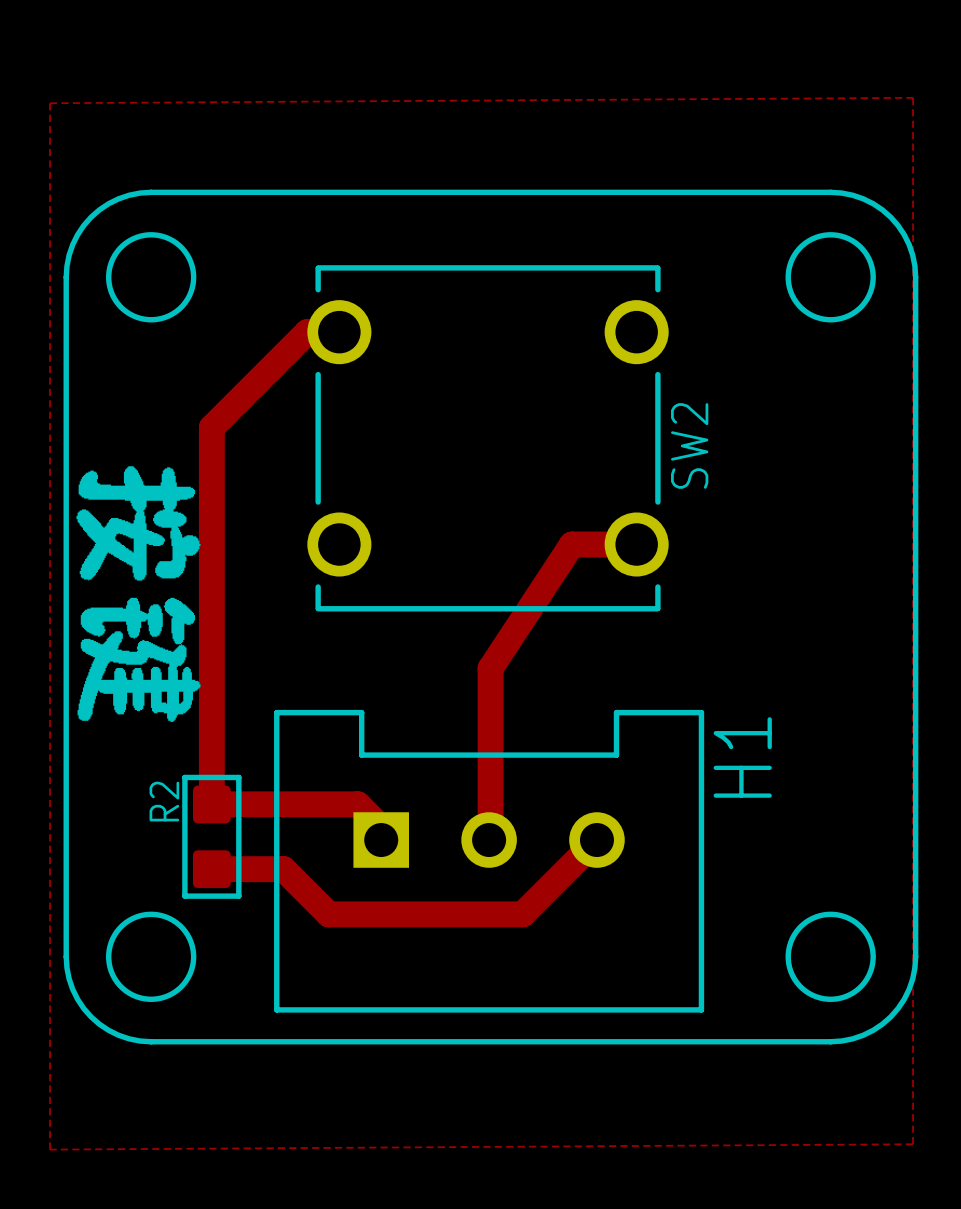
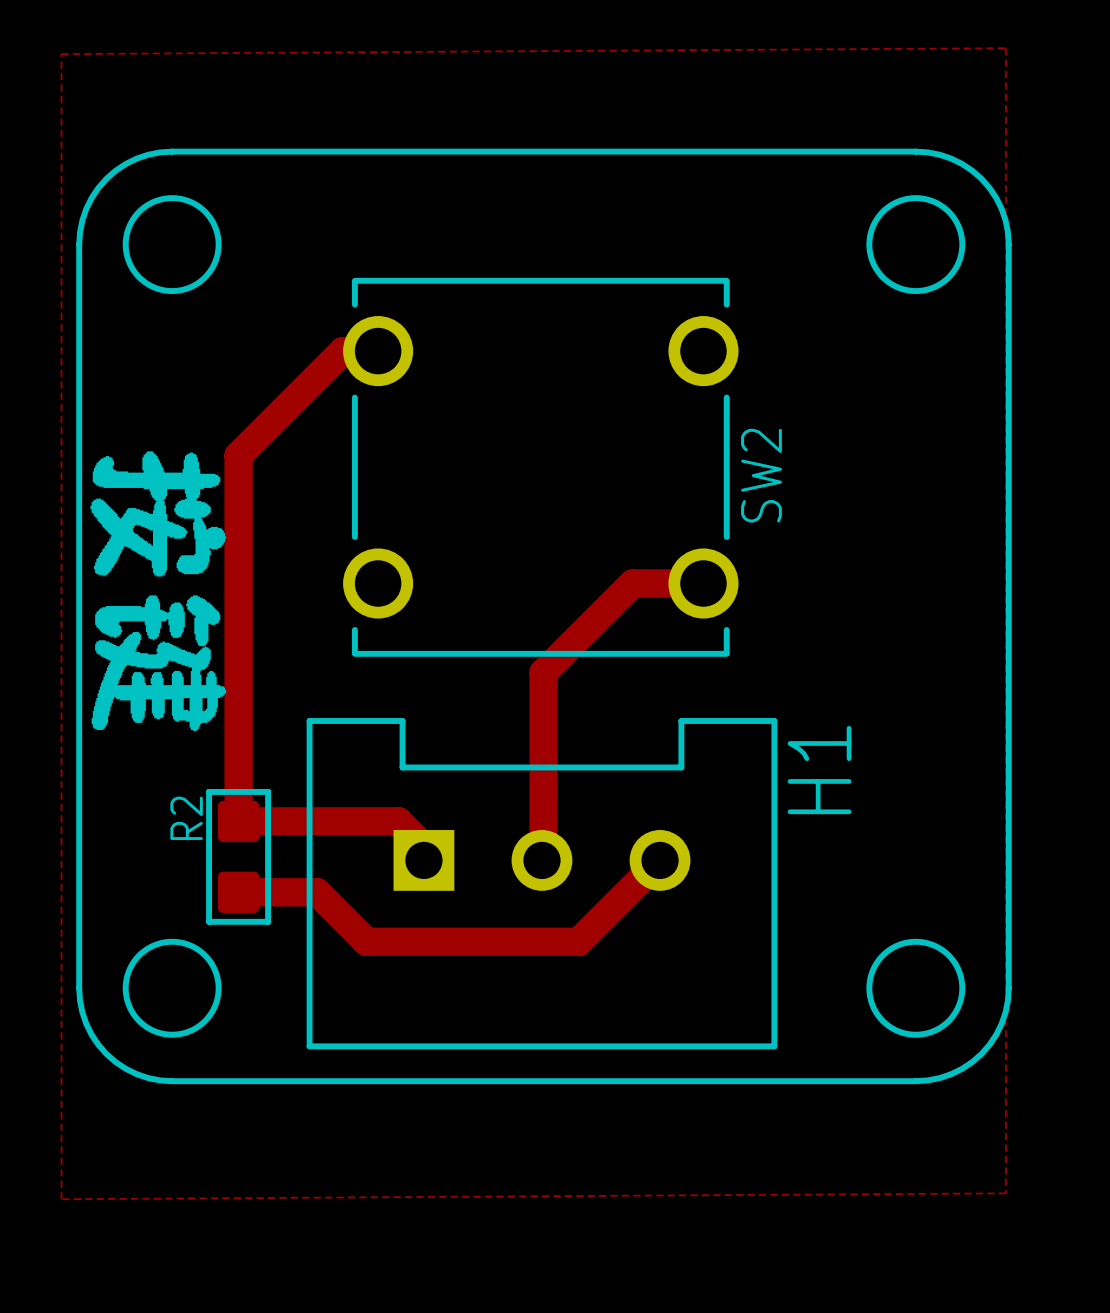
track: (339, 332) (307, 332) (211, 427) (211, 470) -> (378, 351) (342, 351) (238, 455)
SW2 position: (488, 438) -> (540, 467)
track: (636, 544) (571, 544) (490, 668) -> (703, 583) (632, 583) (543, 672)

